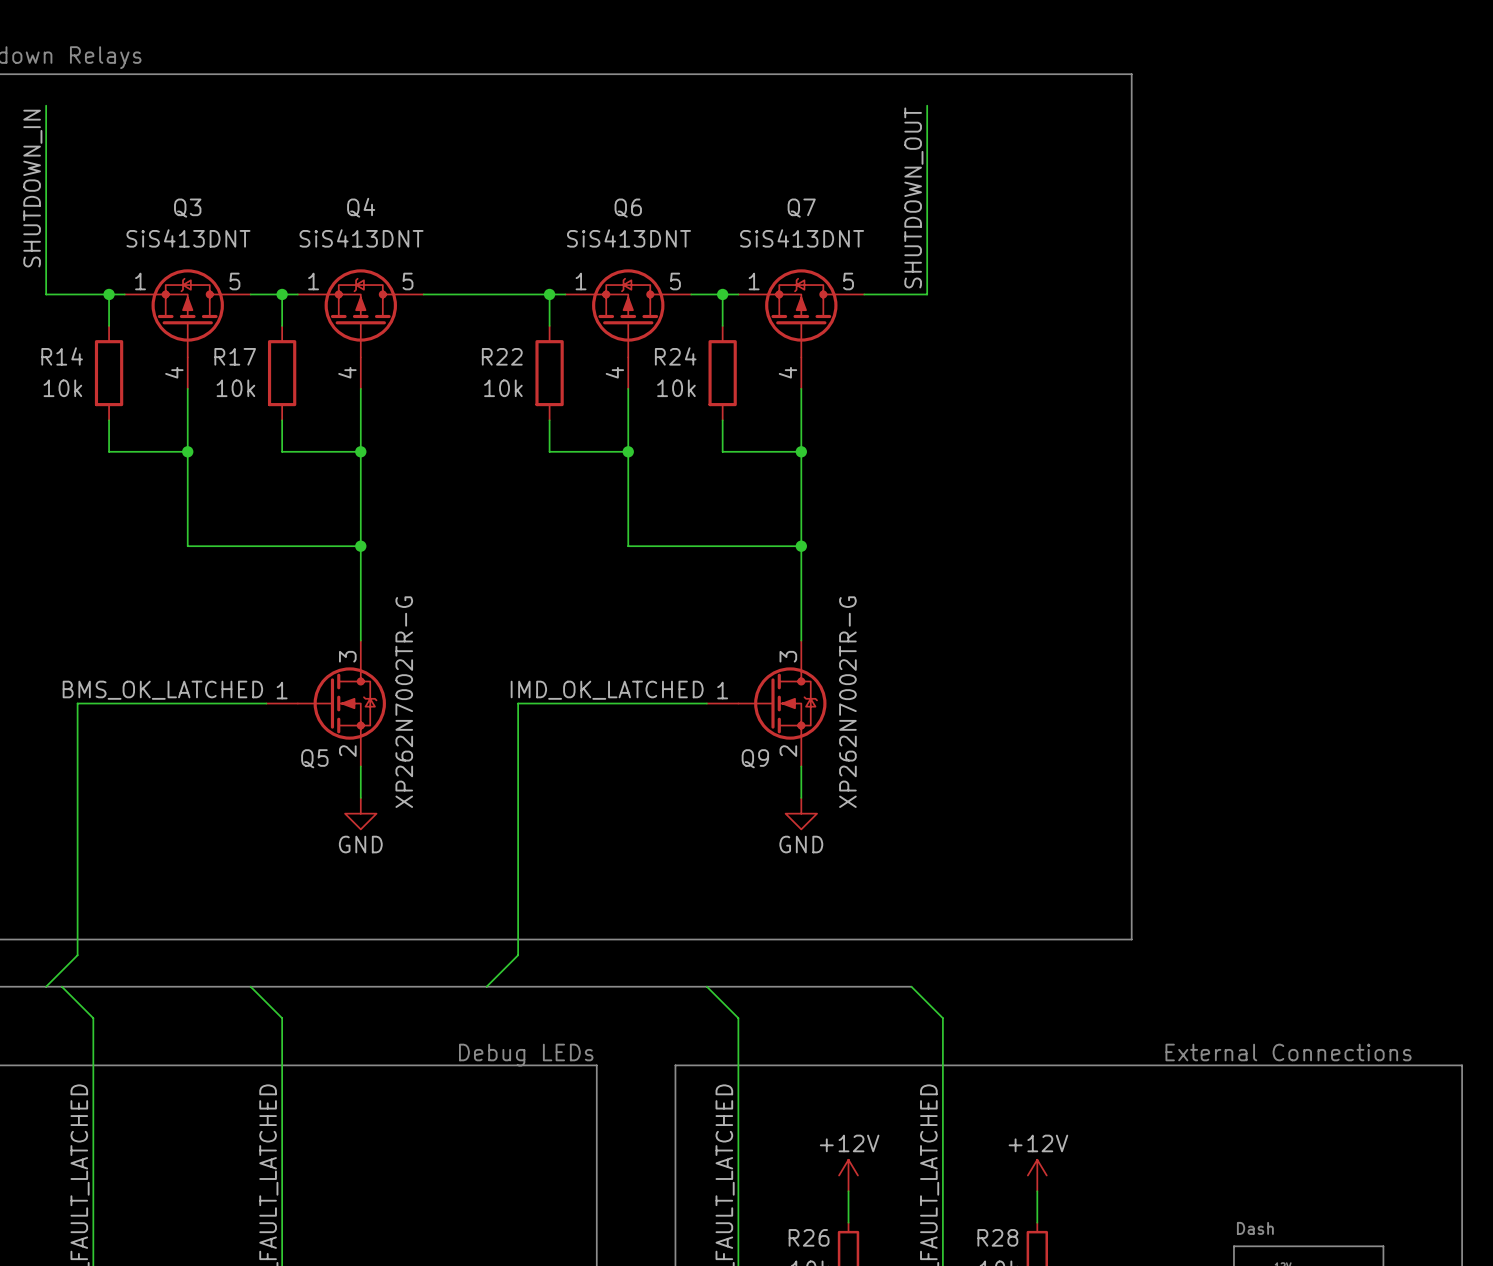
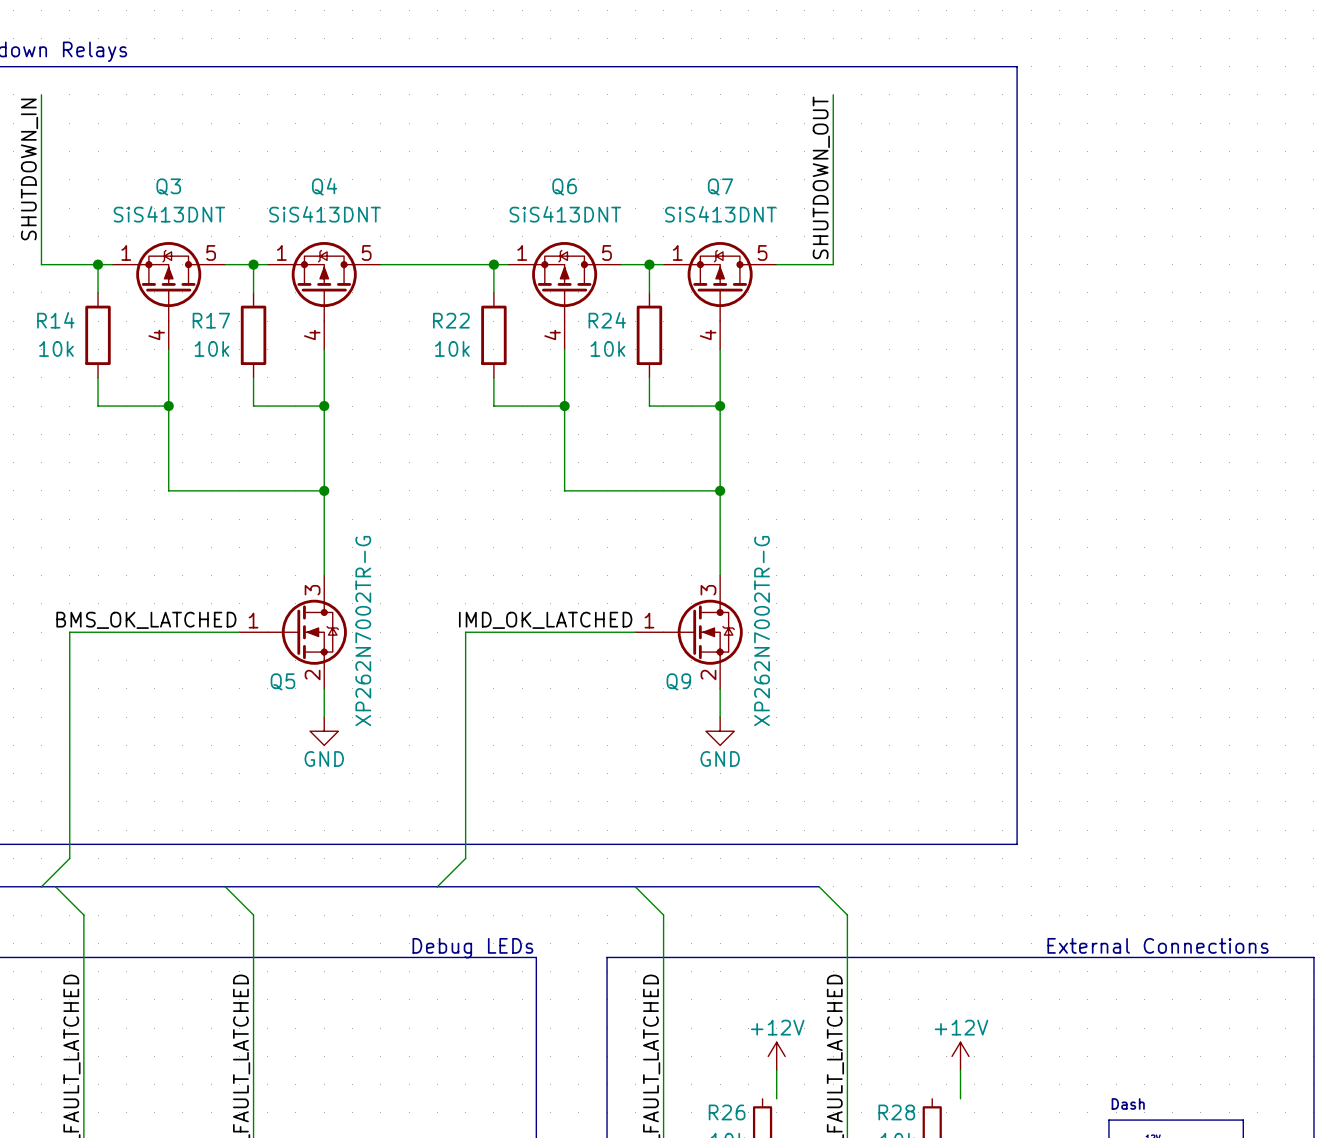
power symbol position: +12V (848, 1175) -> +12V (776, 1056)
power symbol position: +12V (1037, 1175) -> +12V (960, 1056)
wire: (848, 1191) (848, 1222) -> (776, 1070) (776, 1098)
wire: (1037, 1191) (1037, 1222) -> (960, 1070) (960, 1098)

